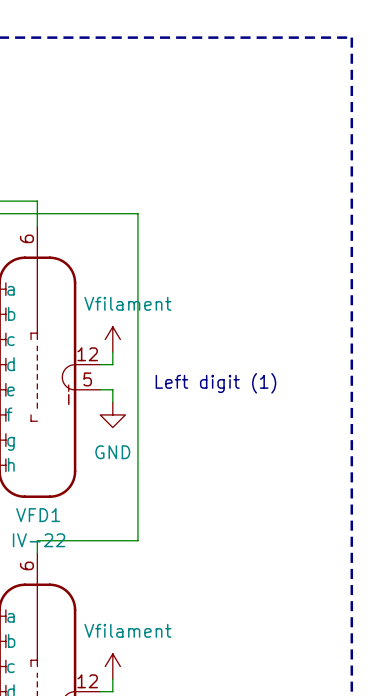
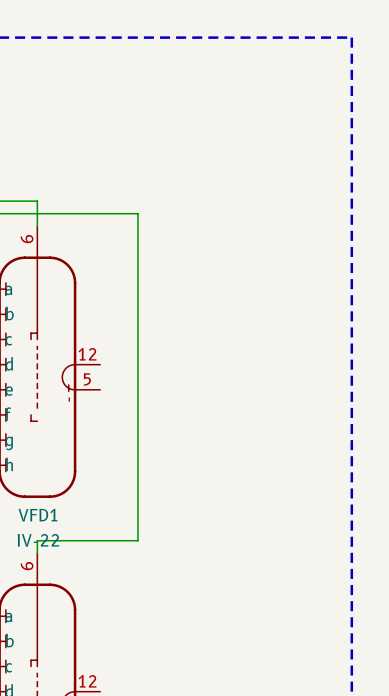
power symbol: Vfilament (112, 339) -> none
wire: (112, 352) (112, 364) (100, 364) -> none
text: Left digit (1) (215, 383) -> none
wire: (100, 389) (112, 389) (112, 402) -> none
power symbol: GND (112, 414) -> none
power symbol: Vfilament (112, 666) -> none
wire: (112, 679) (112, 691) (100, 691) -> none

